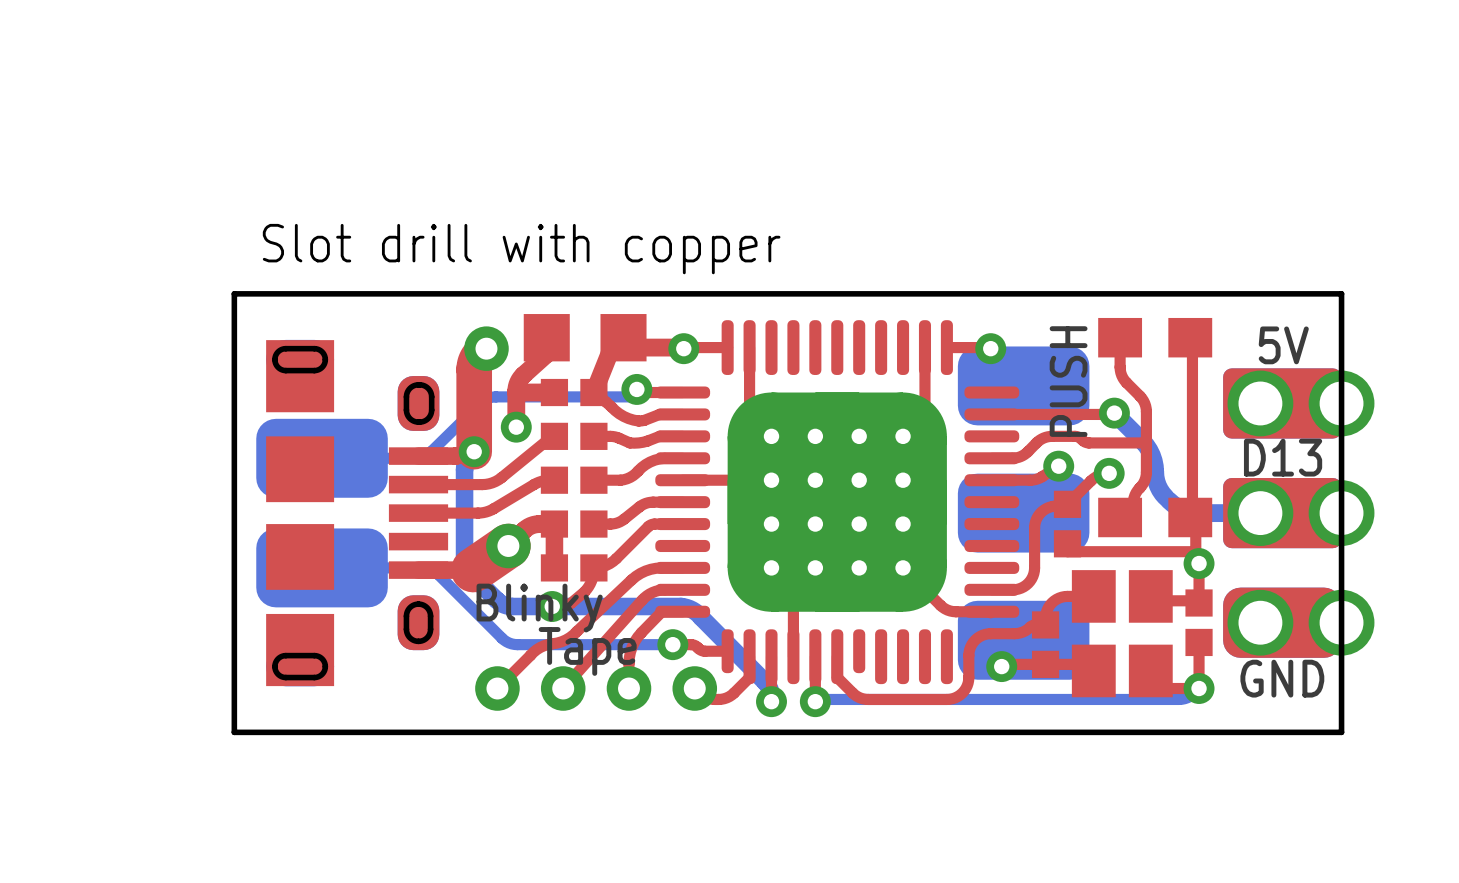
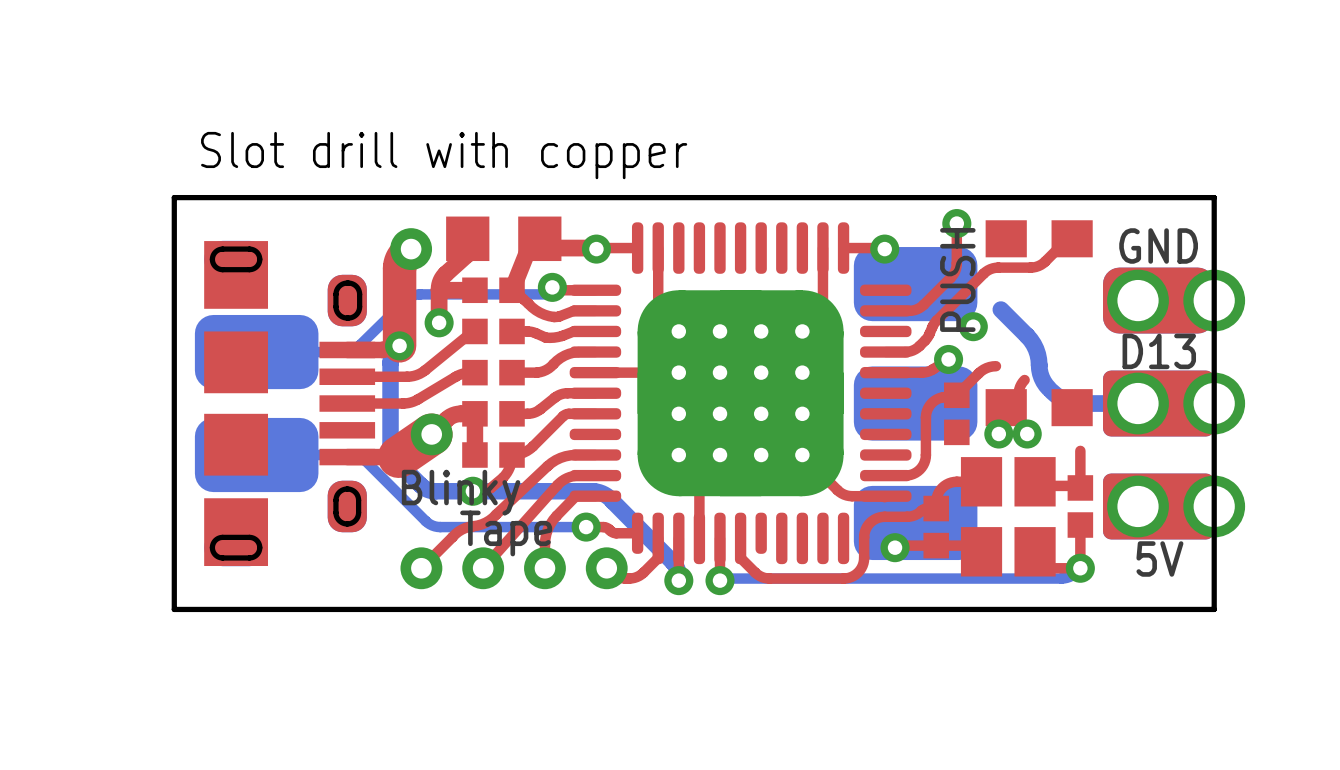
via: none -> (956, 223)
top track: (1120, 337) (1121, 375) (1141, 398) (1146, 408) (1146, 475) (1139, 487) -> none
top track: (1190, 337) (1192, 345) (1192, 500) (1190, 517) (1195, 524) (1195, 553) (1199, 563) (1193, 551) (1067, 551) -> none
text: 5V (1283, 345) -> GND (1158, 245)
top track: (1114, 413) (1016, 414) -> (956, 223) (956, 263) (954, 273) (921, 306) (909, 310)
via position: (1114, 413) -> (973, 326)
top track: (1146, 442) (1087, 442) (1076, 436) (1049, 436) (1039, 440) (1022, 455) (1012, 458) -> (1072, 234) (1038, 266) (995, 267) (985, 271) (935, 322) (927, 337) (919, 346) (912, 350) (905, 352)
via: (1109, 473) -> none
part side: top (1298, 513) -> bottom (1174, 403)
via: none -> (998, 434)
via: none -> (1027, 434)
via: (1199, 563) -> none
text: GND (1282, 678) -> 5V (1159, 559)

